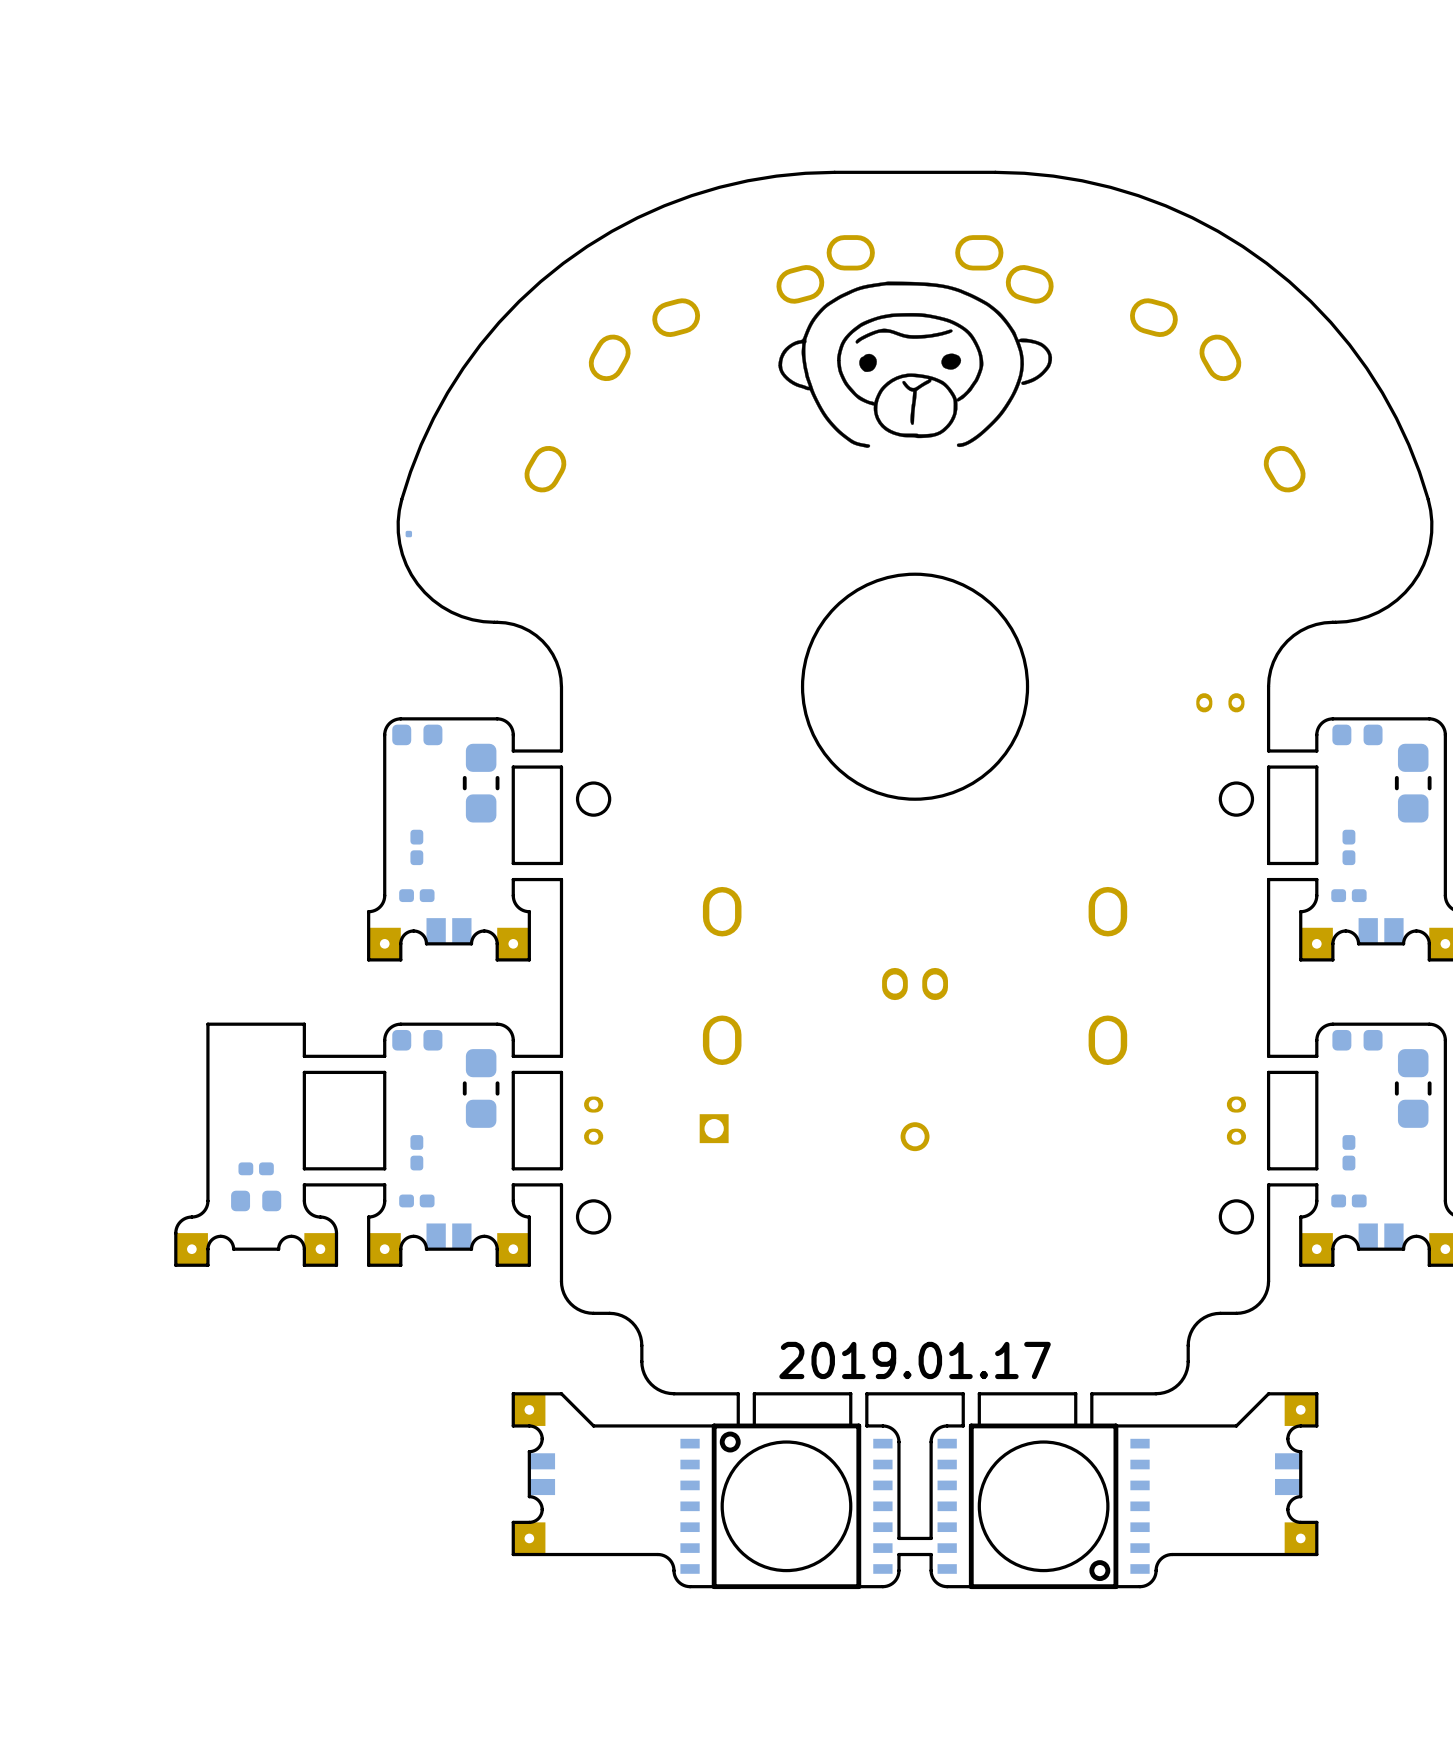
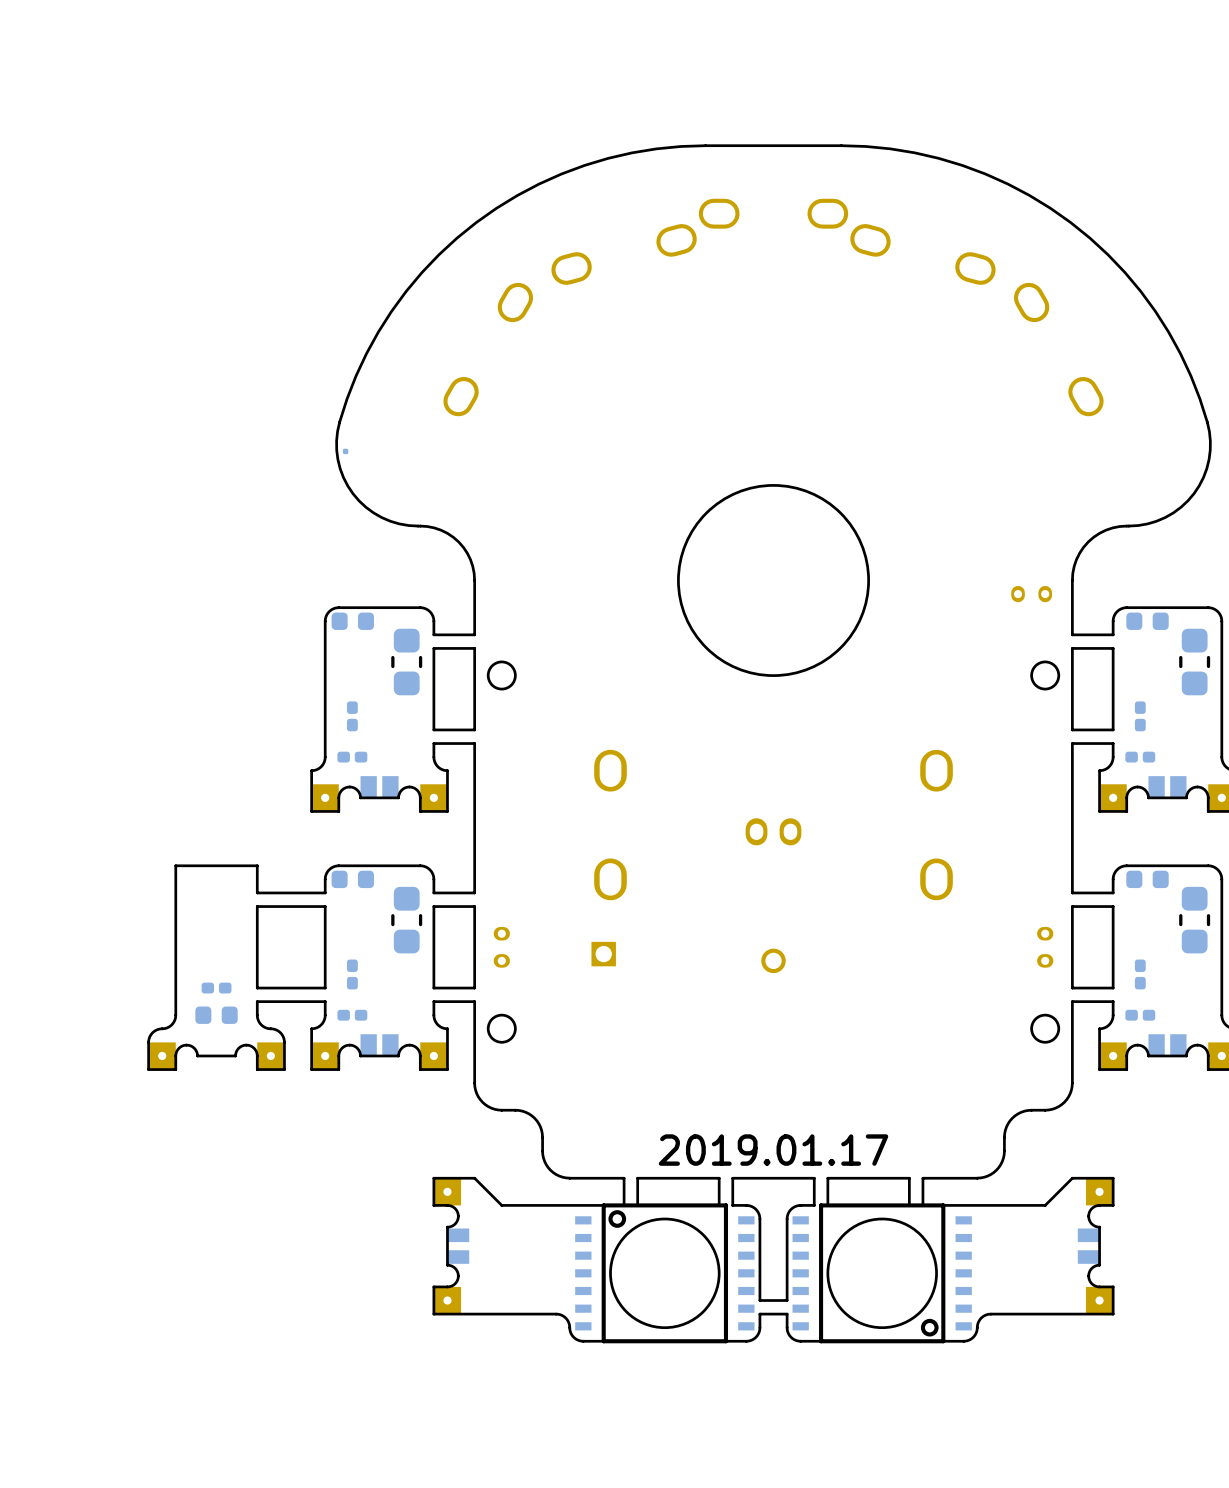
drawing: [778, 281, 1053, 448] -> none

